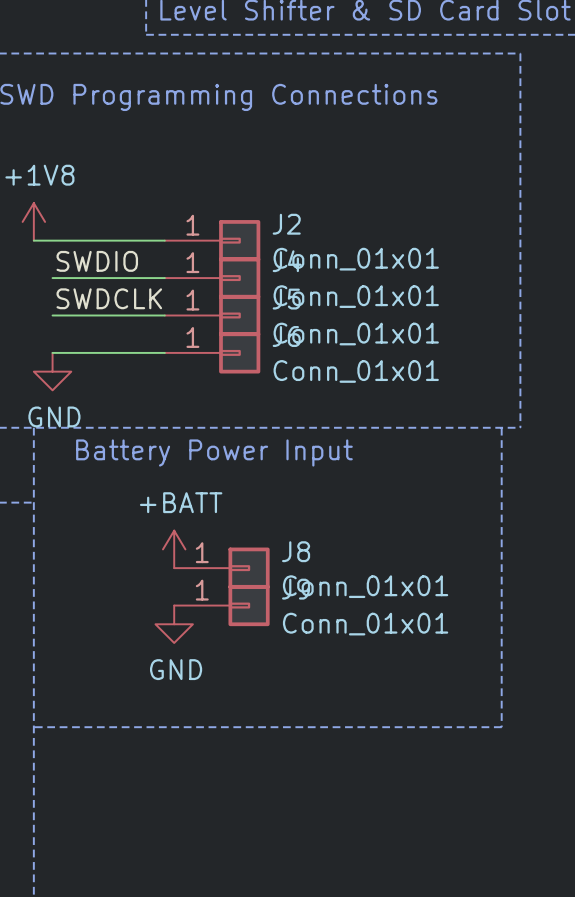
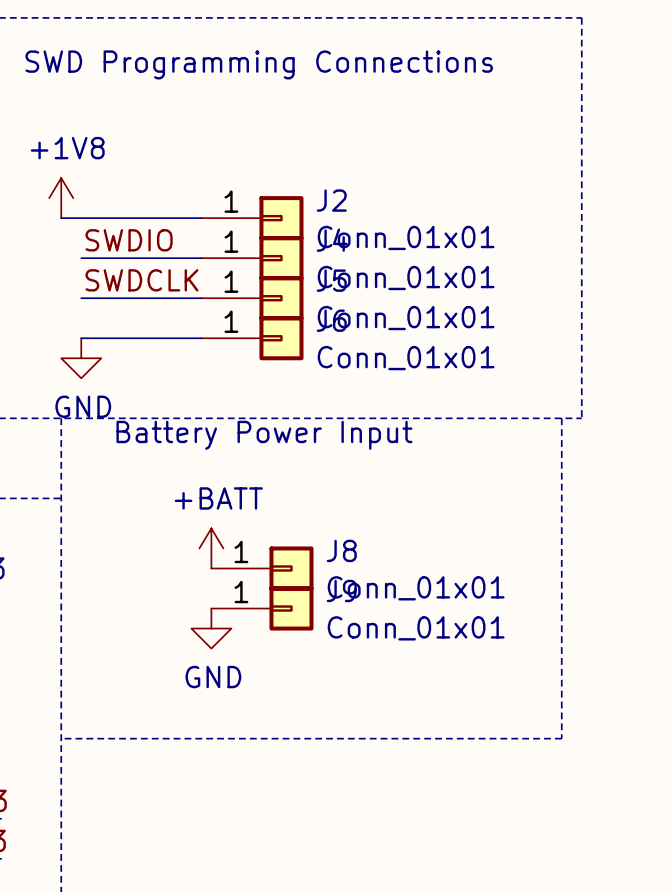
text position: Battery Power Input (214, 452) -> Battery Power Input (264, 435)

